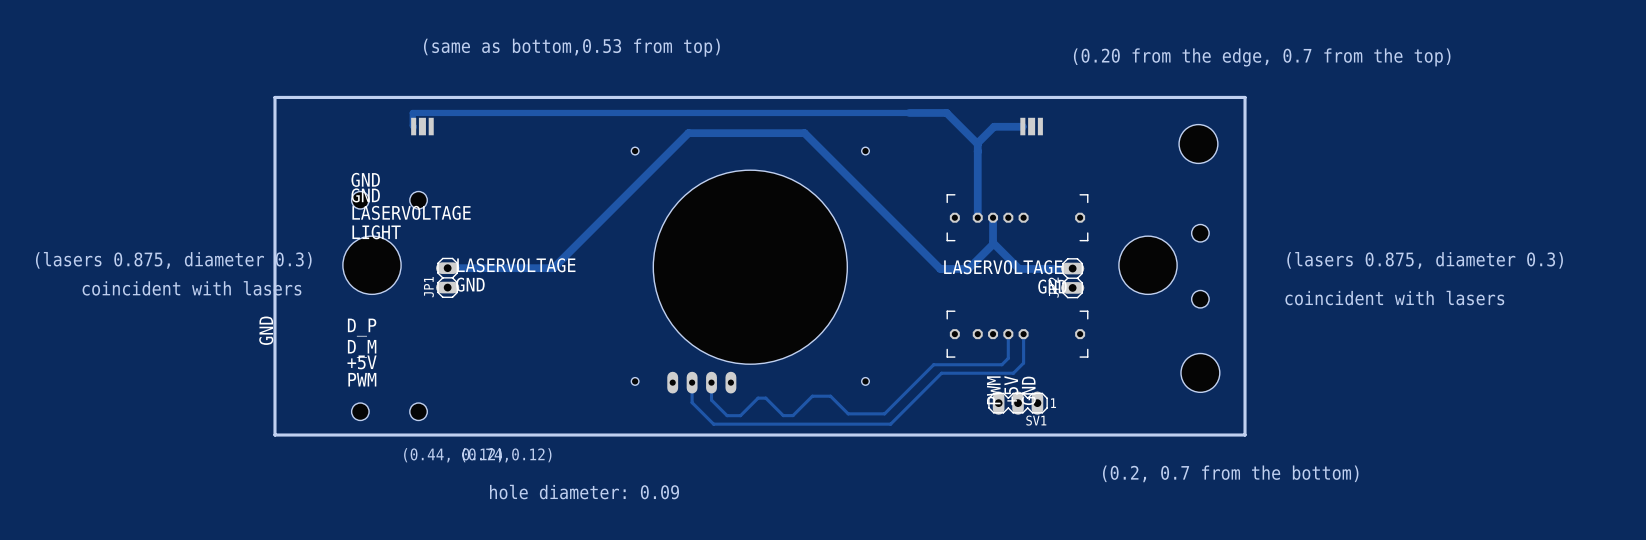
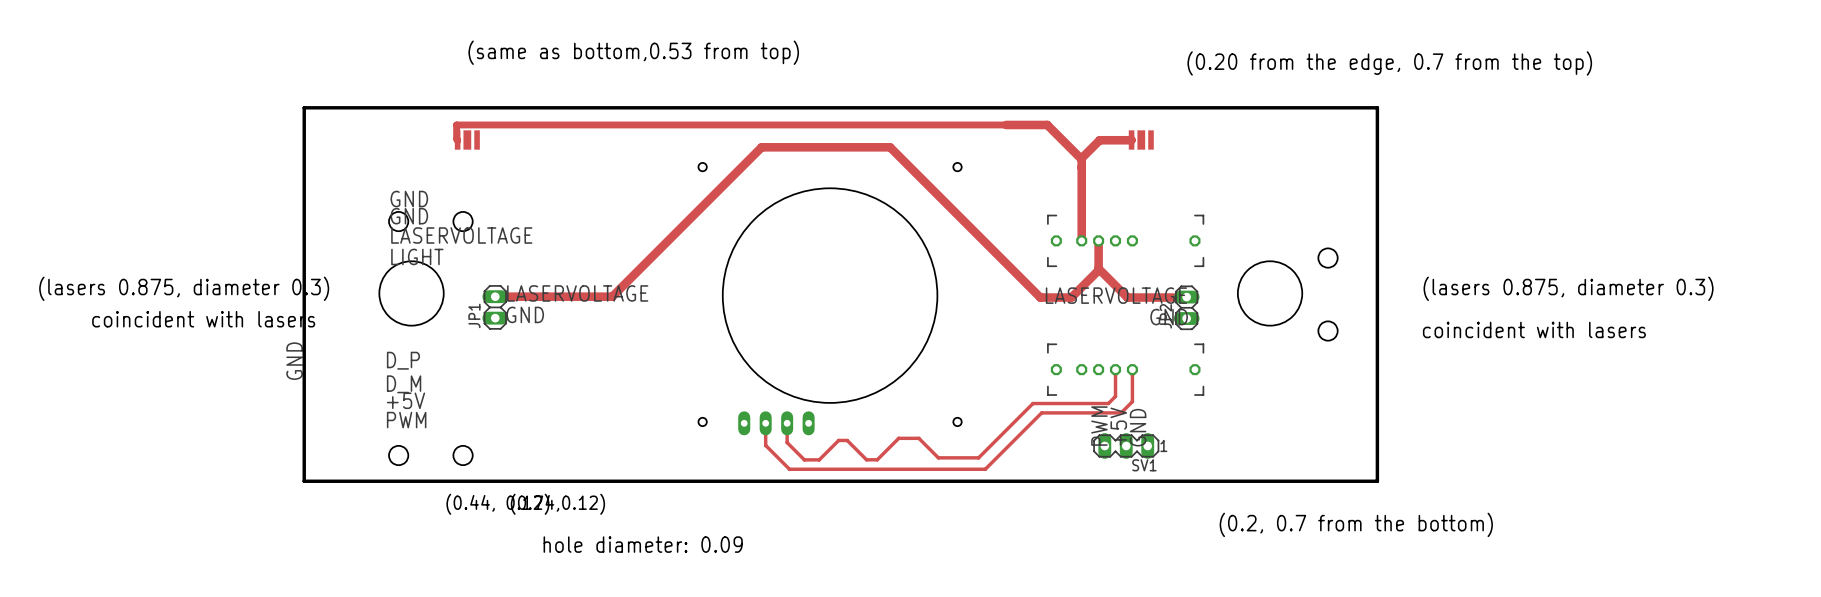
hole: (1198, 144) -> none
hole: (1200, 372) -> none

